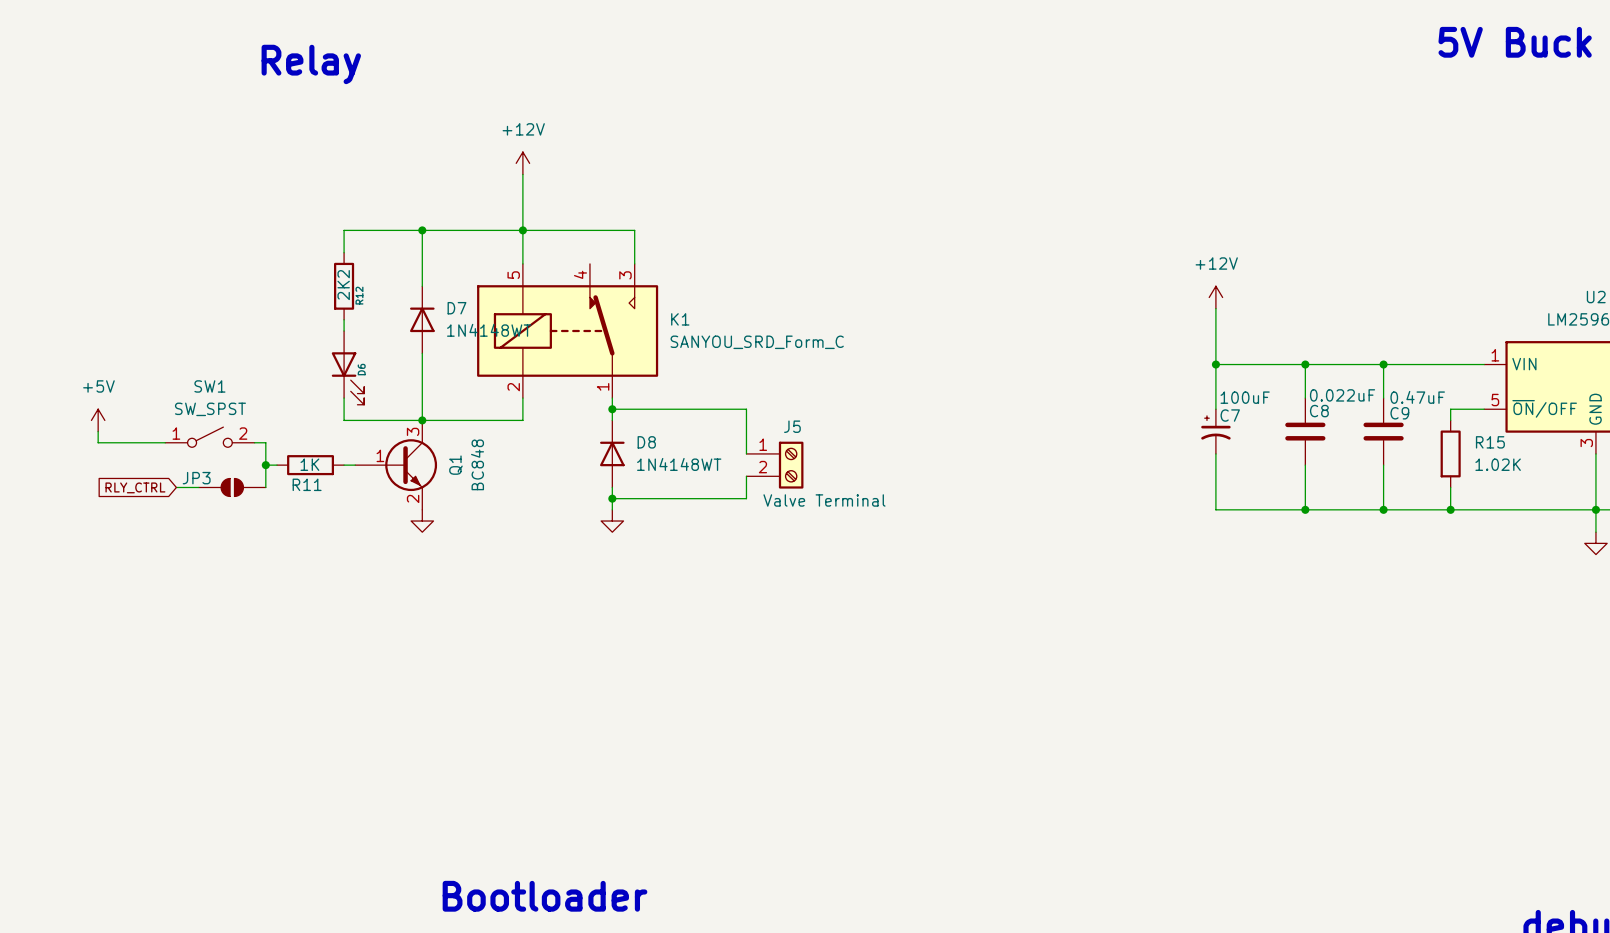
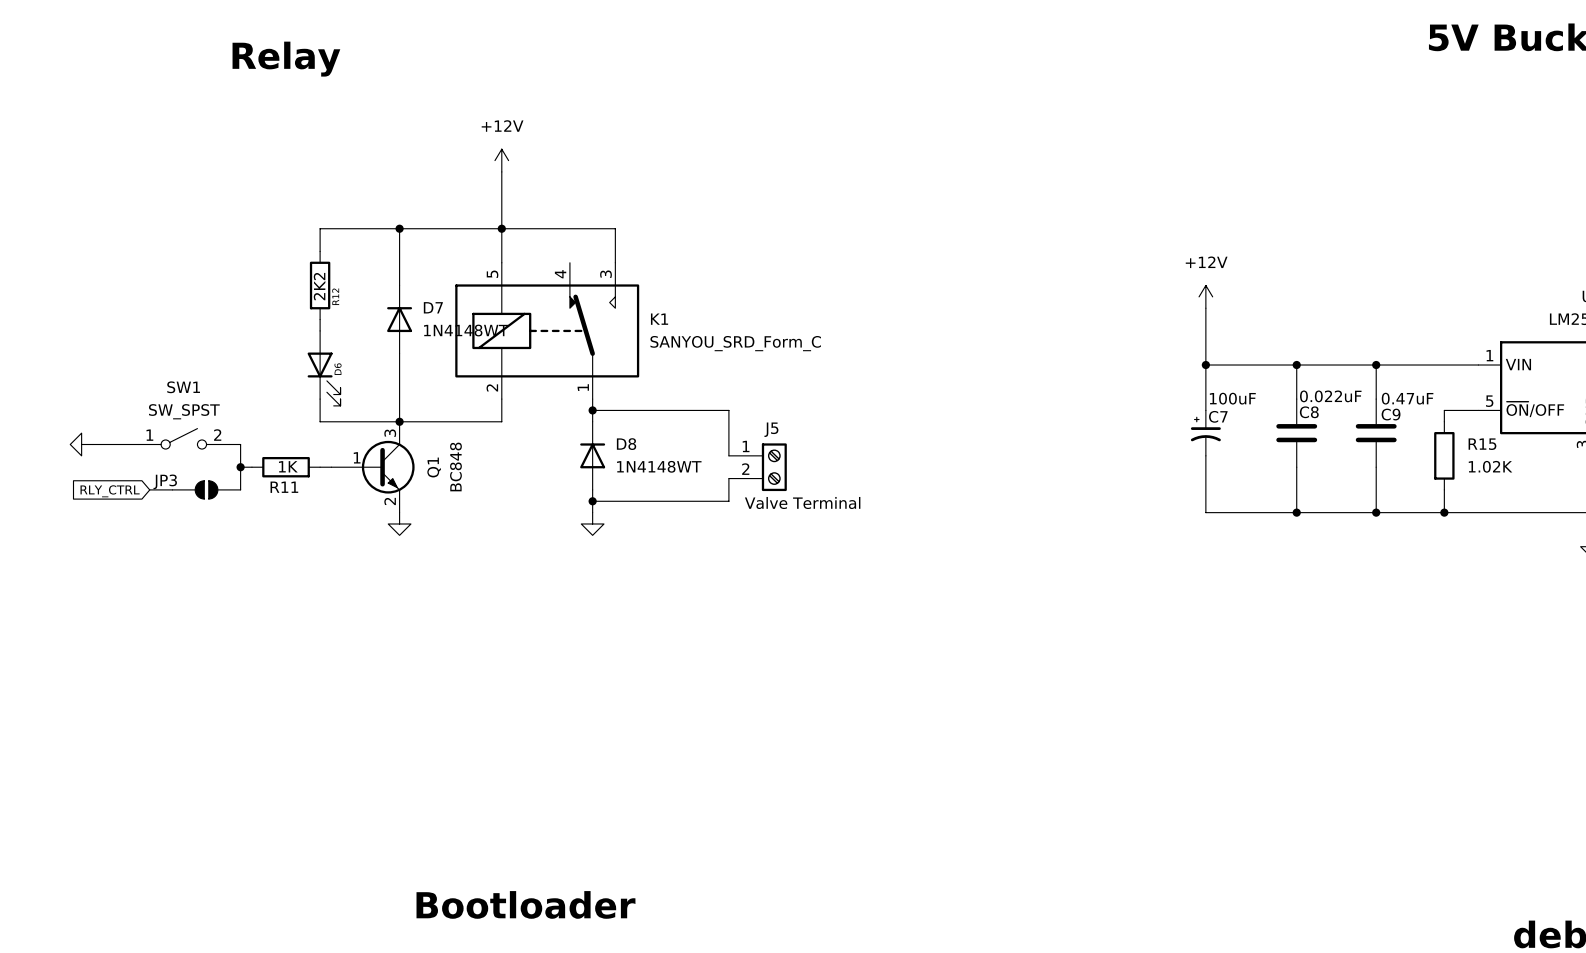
power symbol: +5V (98, 420) -> none
wire: (98, 431) (98, 442) (120, 442) -> none
power symbol: none -> (81, 444)

